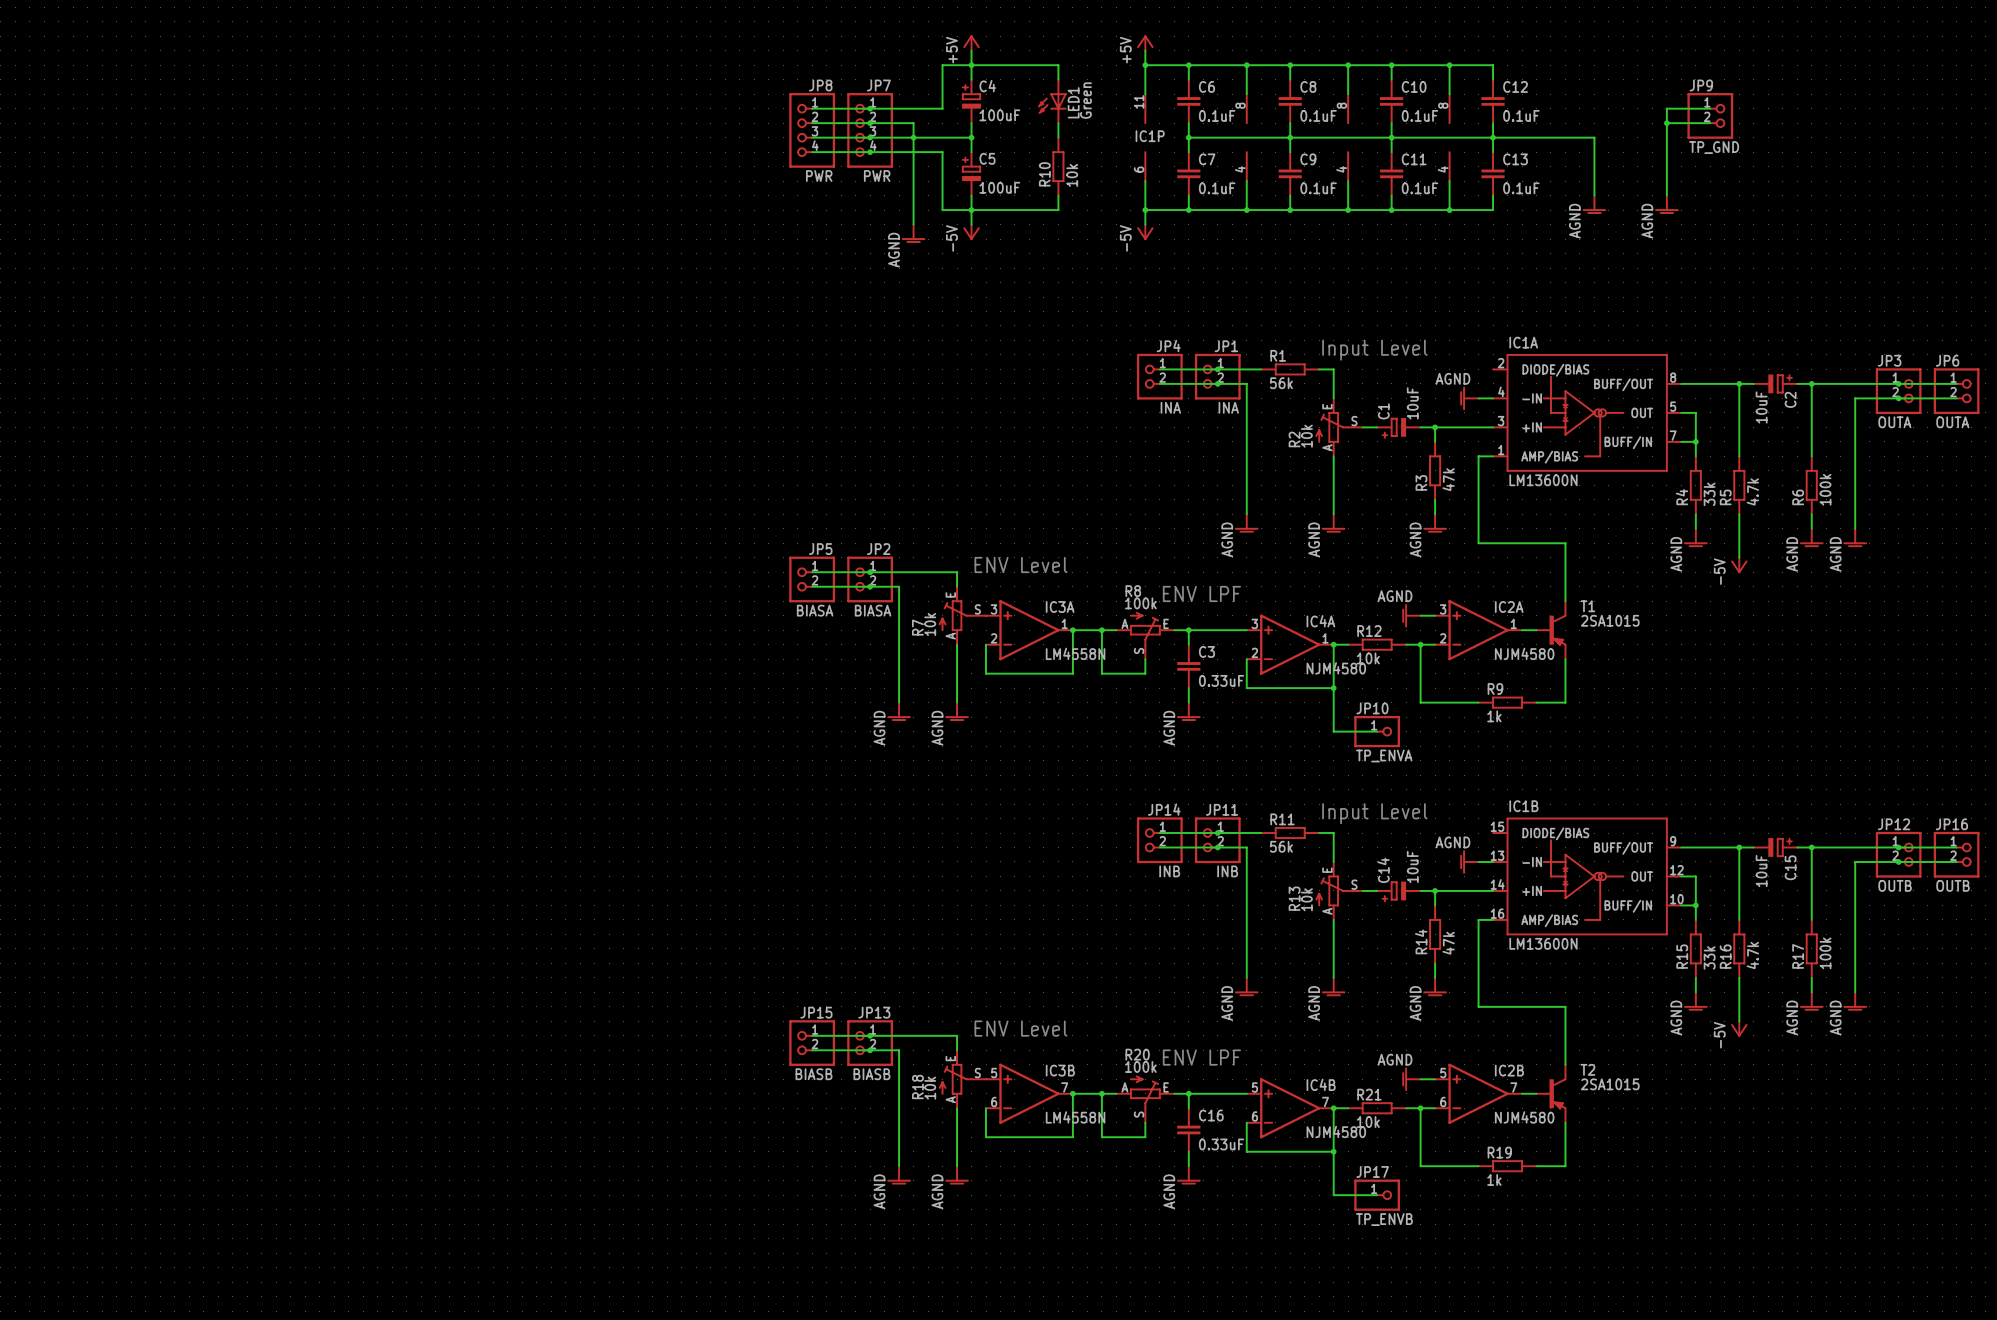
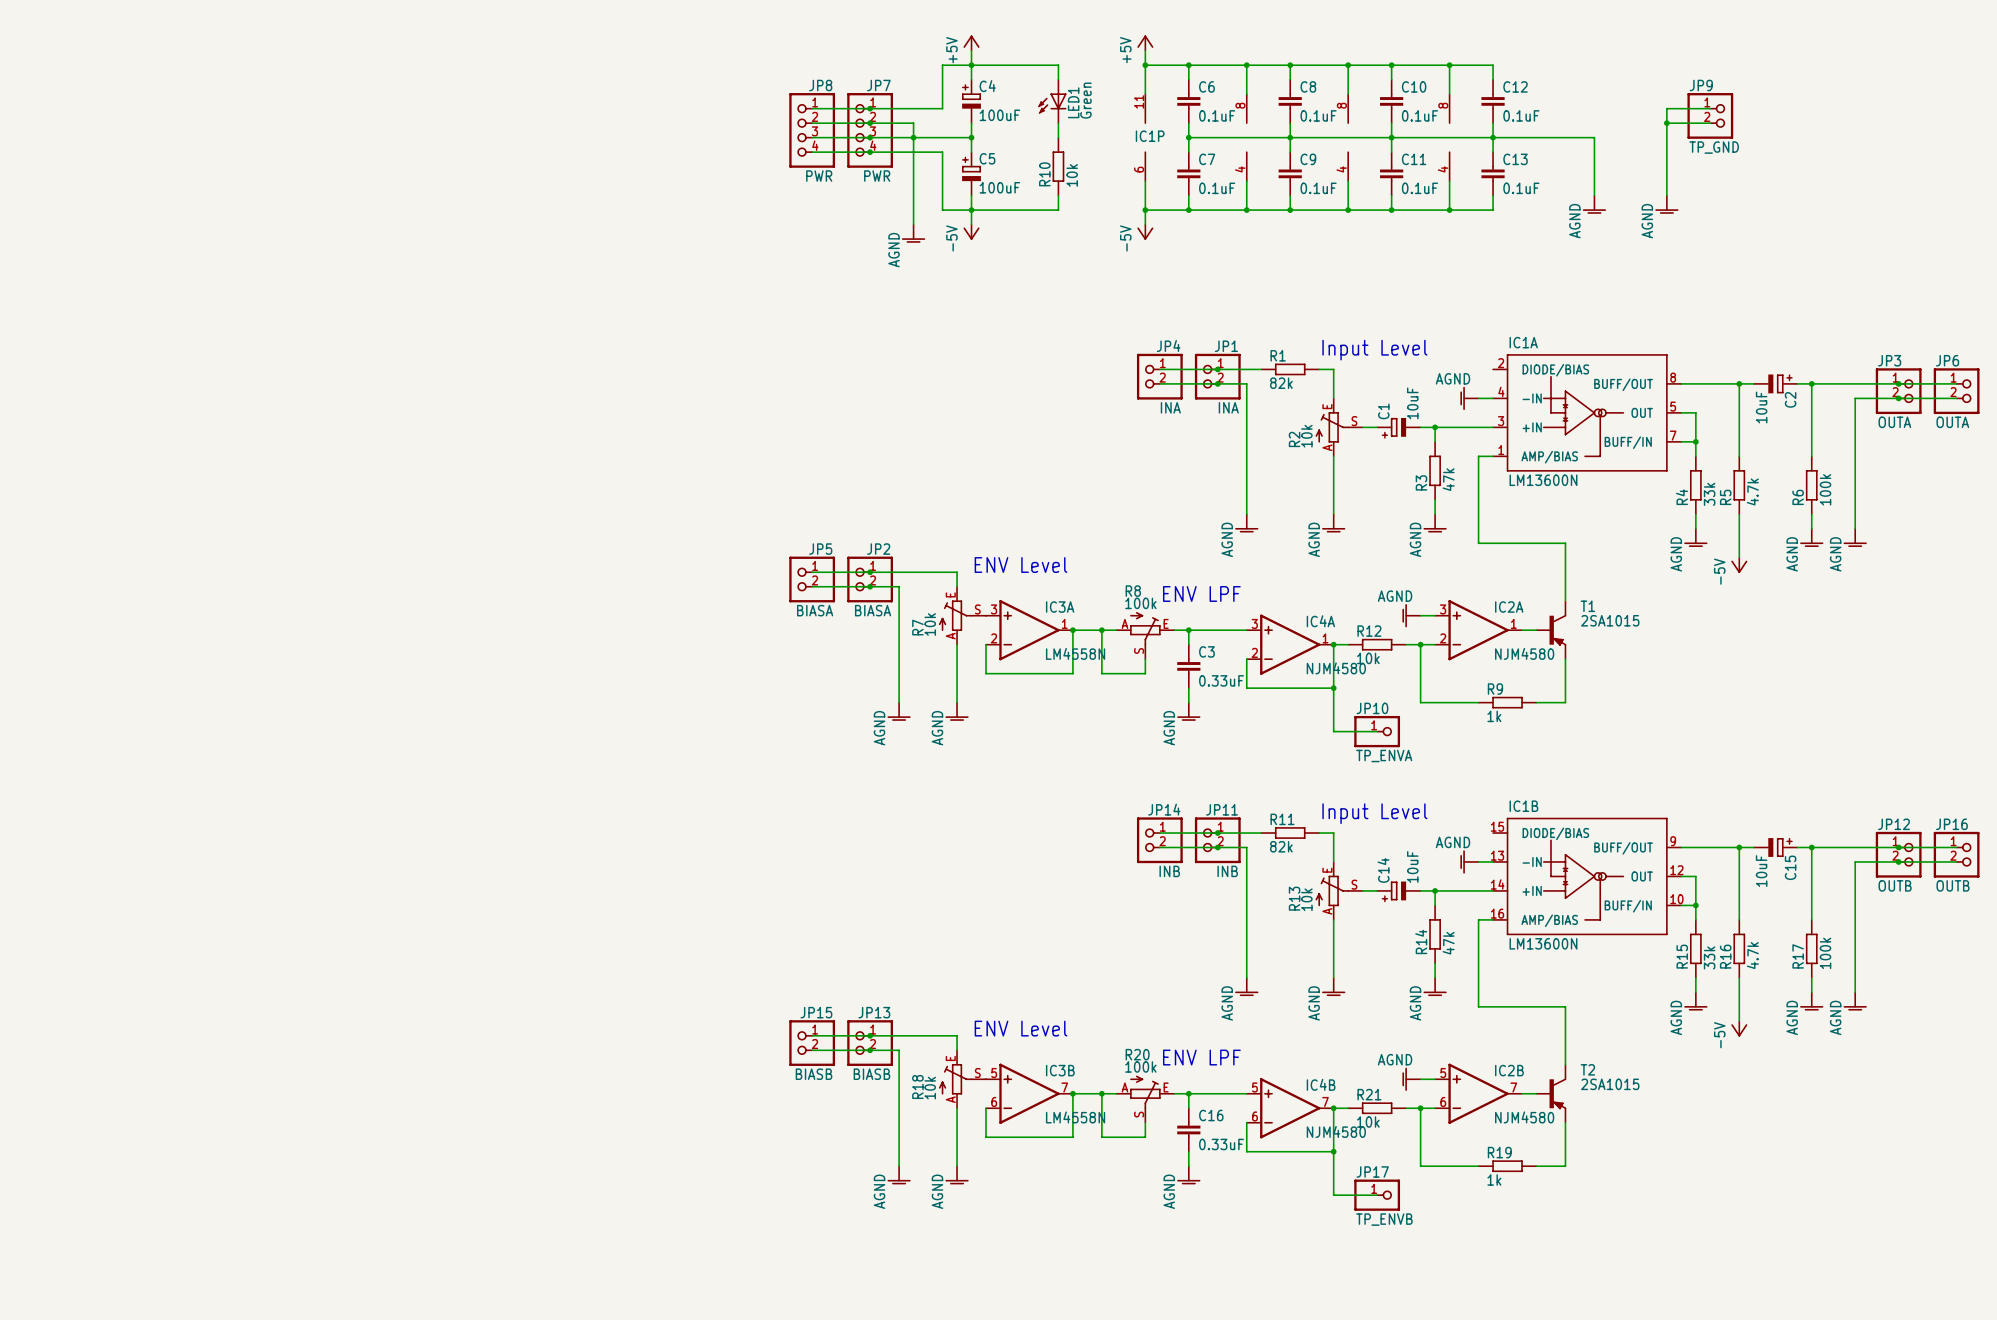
R1 value: 56k (1281, 383) -> 82k (1281, 383)
R11 value: 56k (1281, 846) -> 82k (1281, 846)

